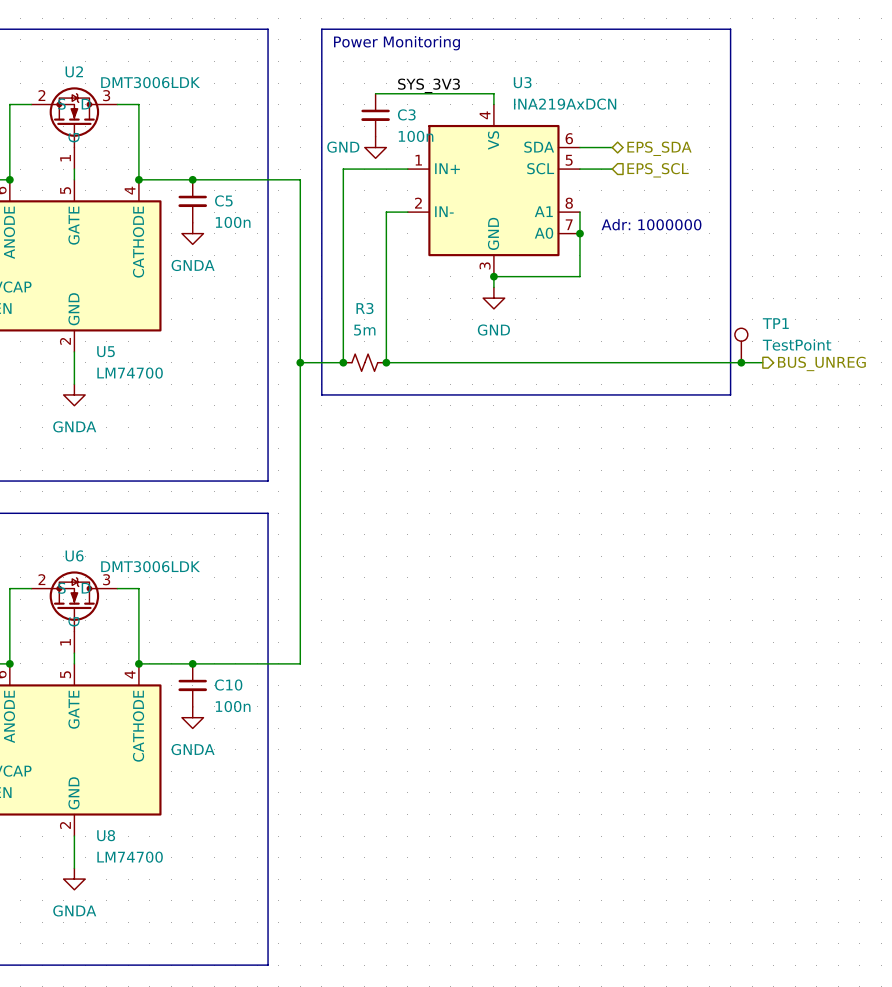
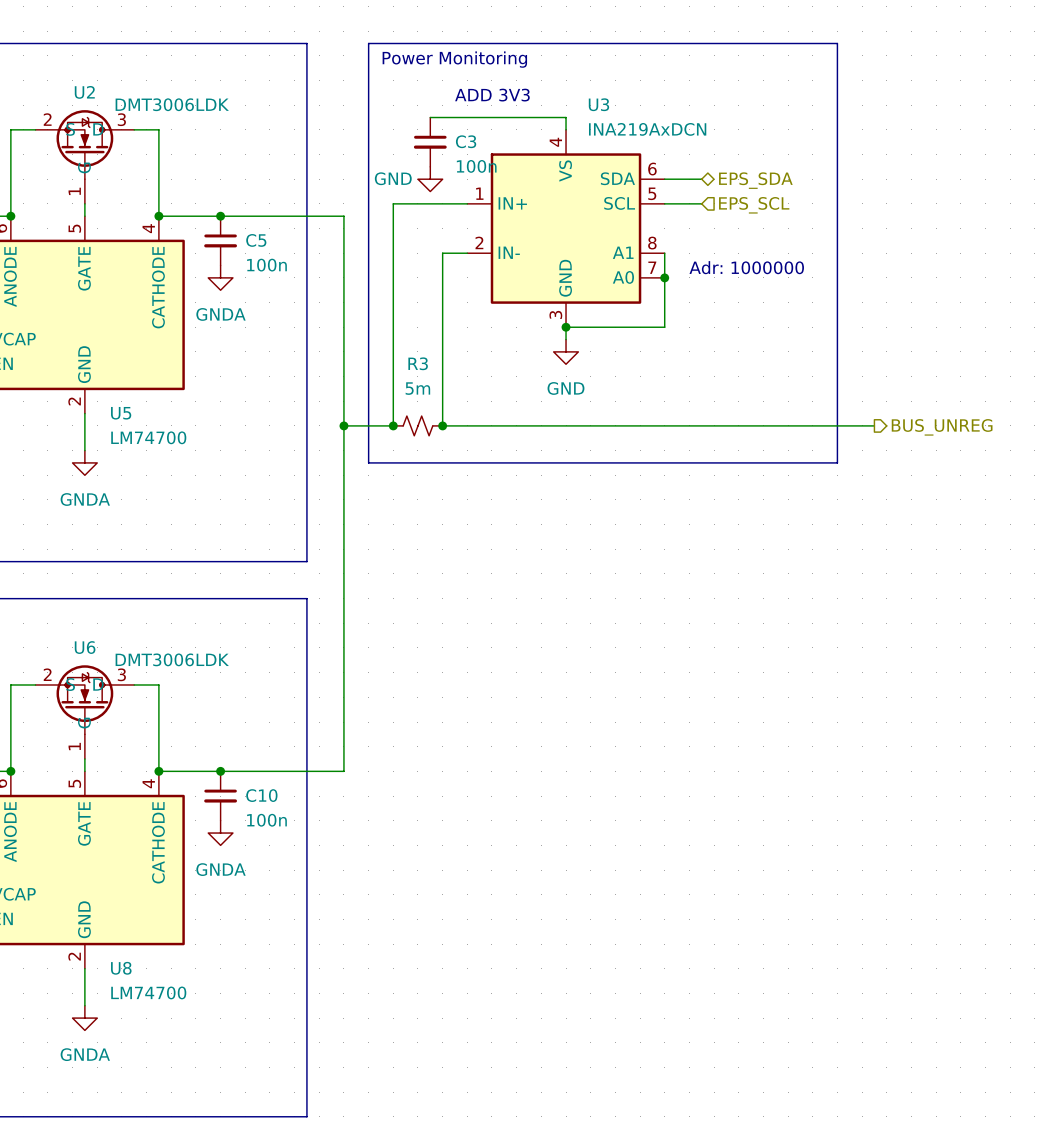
text: none -> ADD 3V3 (492, 95)
label: SYS_3V3 (429, 85) -> none
TP1: TestPoint (741, 345) -> none
junction: (741, 362) -> none

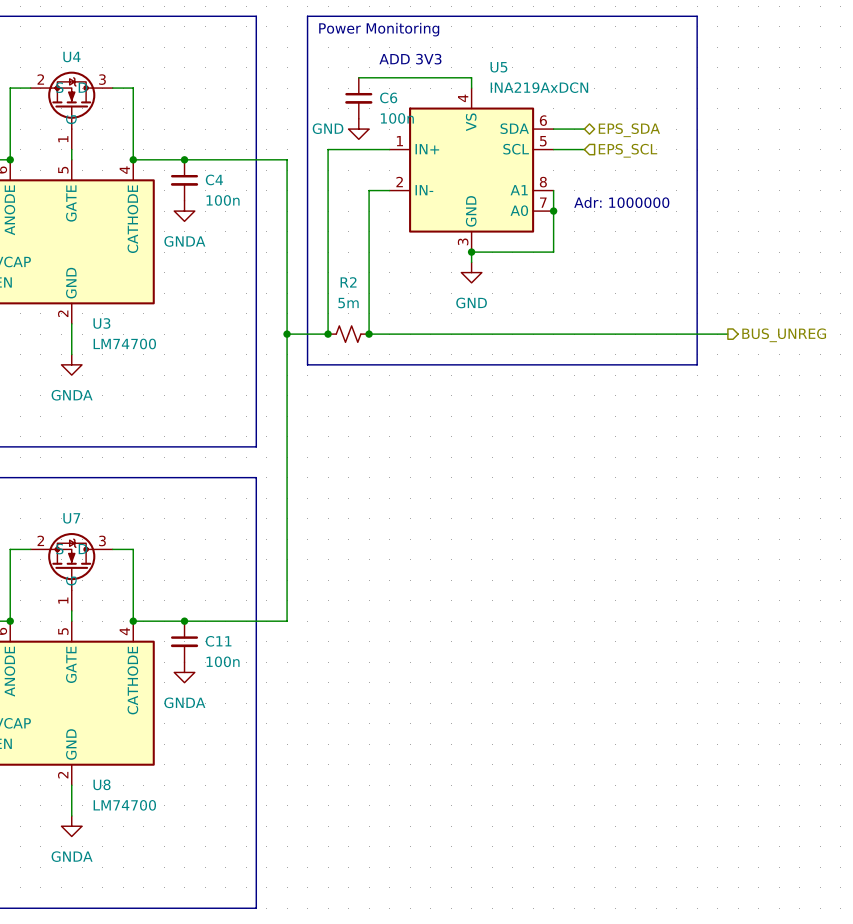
U2 name: U2 (84, 92) -> U4 (71, 57)
U2 value: DMT3006LDK (172, 104) -> none
U3 name: U3 (598, 104) -> U5 (498, 67)
C3 name: C3 (466, 141) -> C6 (388, 97)
C5 name: C5 (256, 240) -> C4 (214, 179)
R3 name: R3 (418, 363) -> R2 (348, 282)
U5 name: U5 (121, 413) -> U3 (101, 323)
U6 name: U6 (85, 647) -> U7 (71, 518)
U6 value: DMT3006LDK (172, 659) -> none
C10 name: C10 (261, 795) -> C11 (218, 641)

